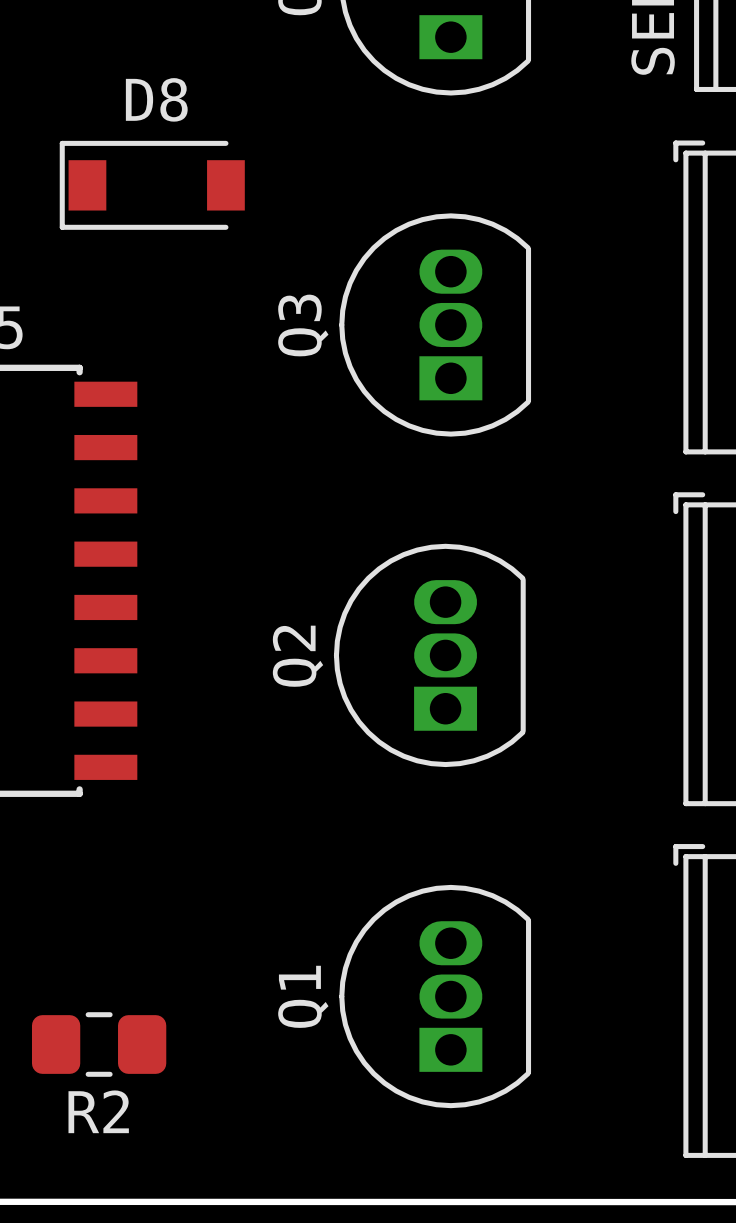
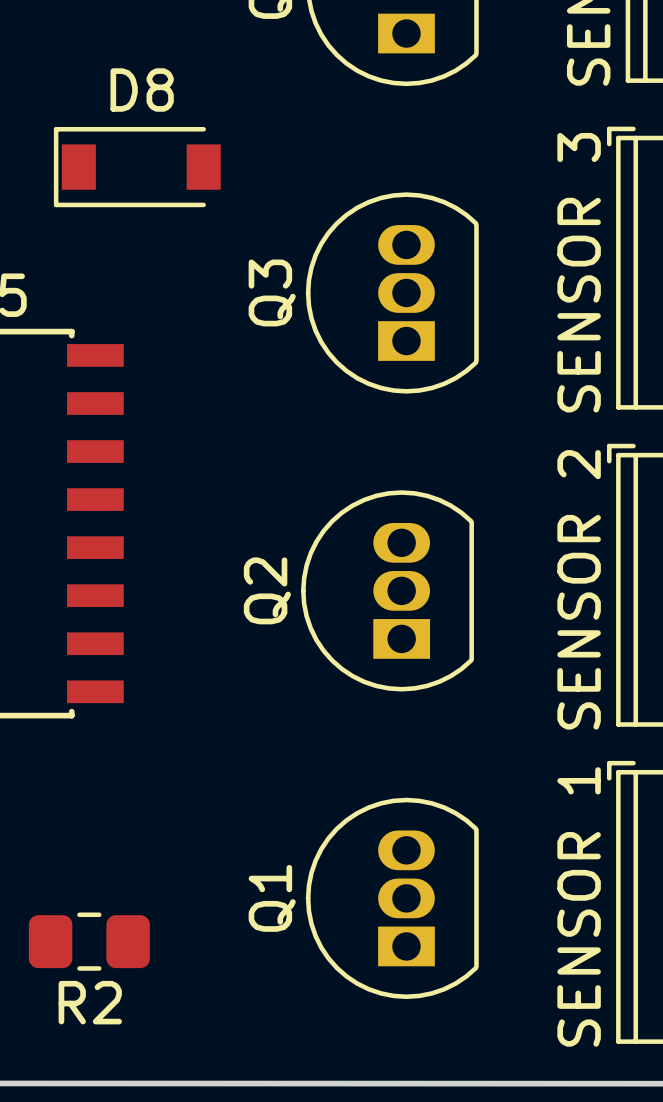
part value: none -> SENSOR 3 (579, 272)
part value: none -> SENSOR 2 (579, 589)
part value: none -> SENSOR 1 (579, 906)

